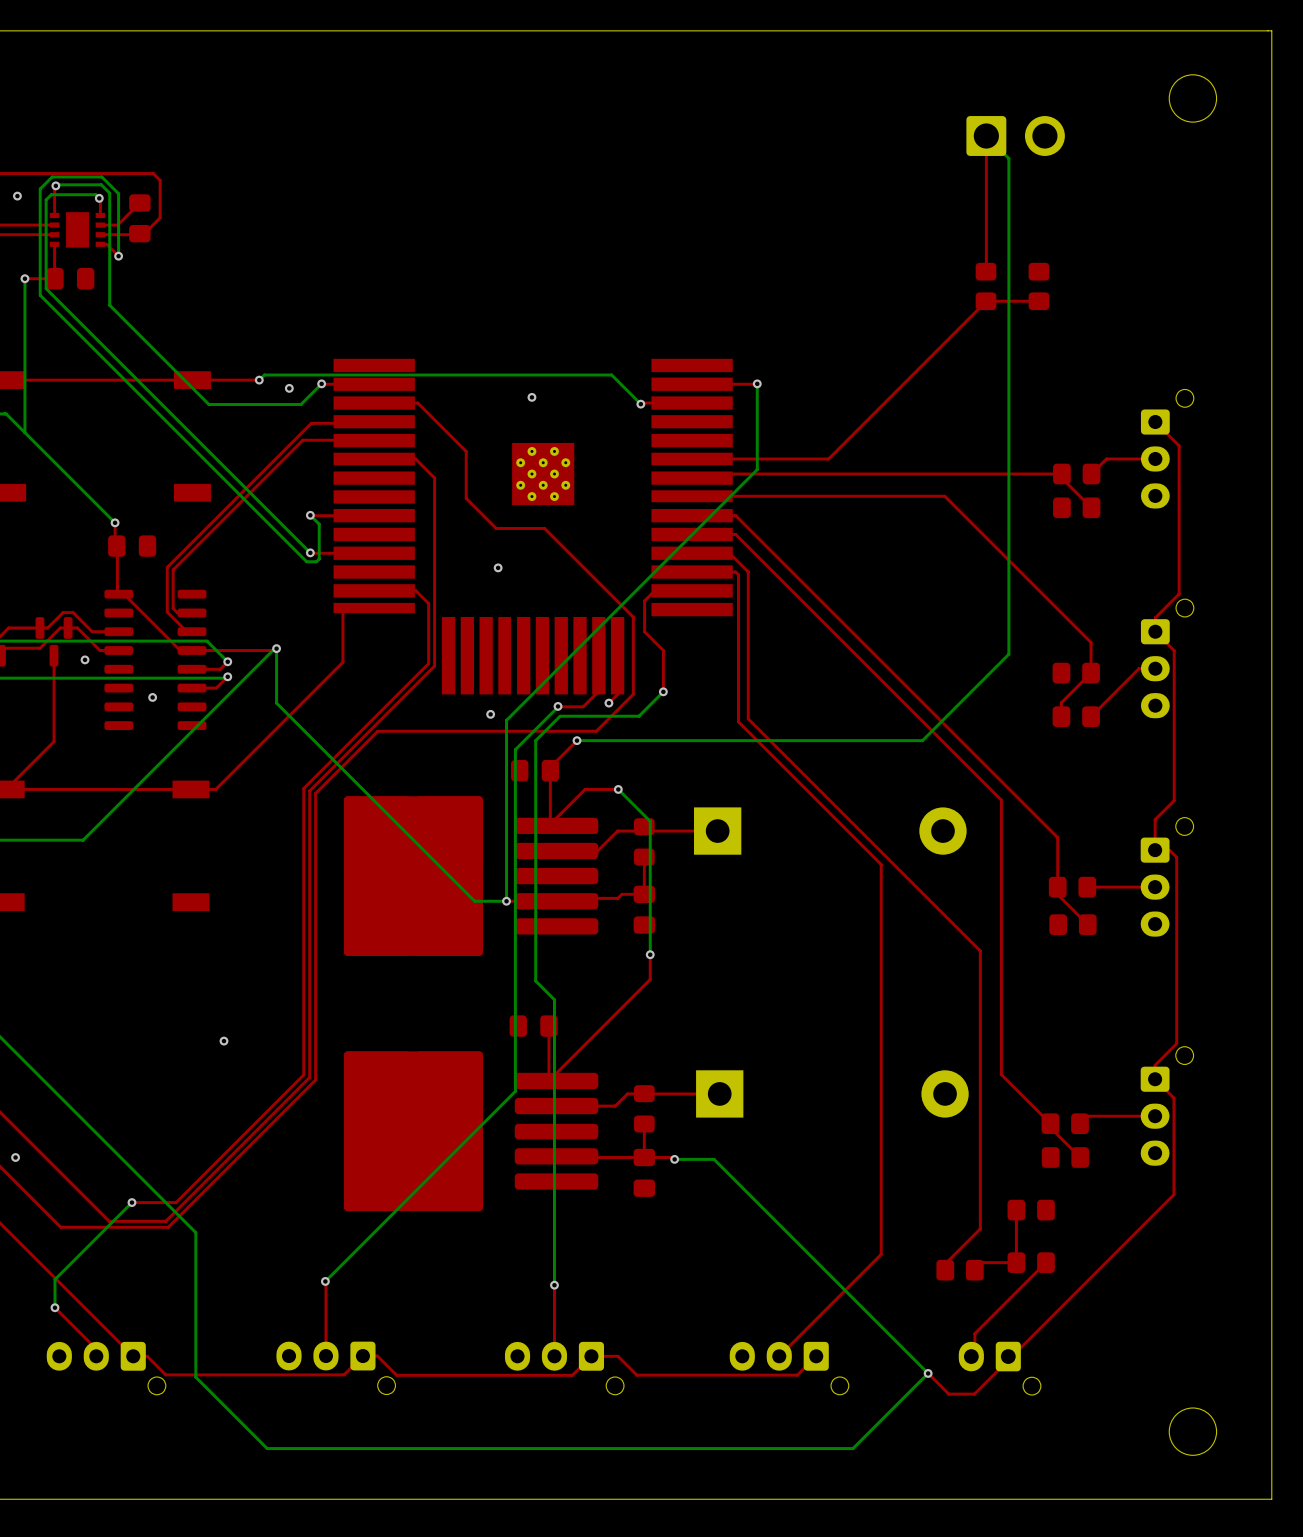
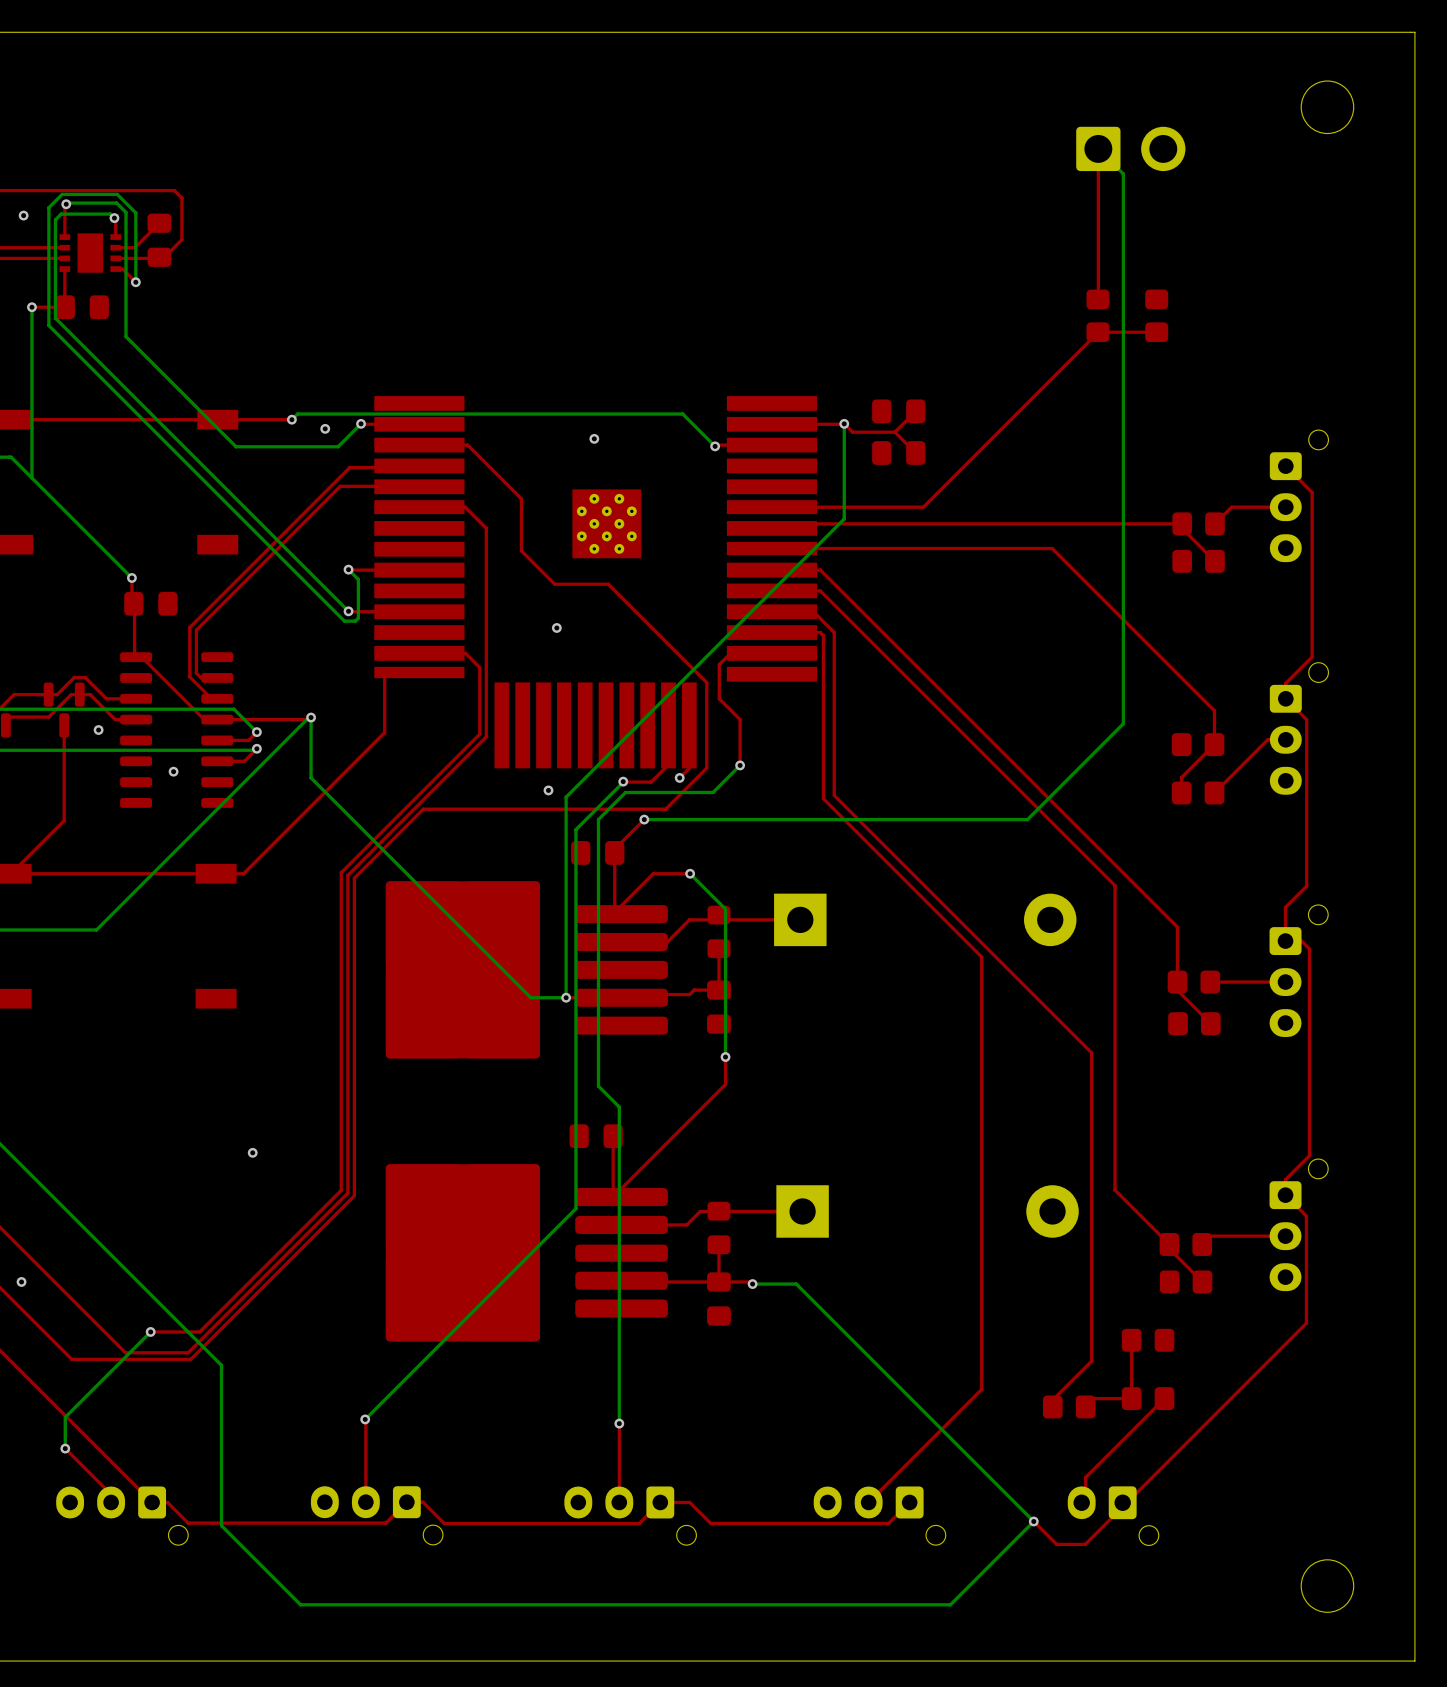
part: none -> (898, 411)
top track: none -> (915, 411) (894, 432)
top track: none -> (844, 423) (852, 432) (894, 432)
top track: none -> (894, 432) (915, 453)
part: none -> (898, 453)

